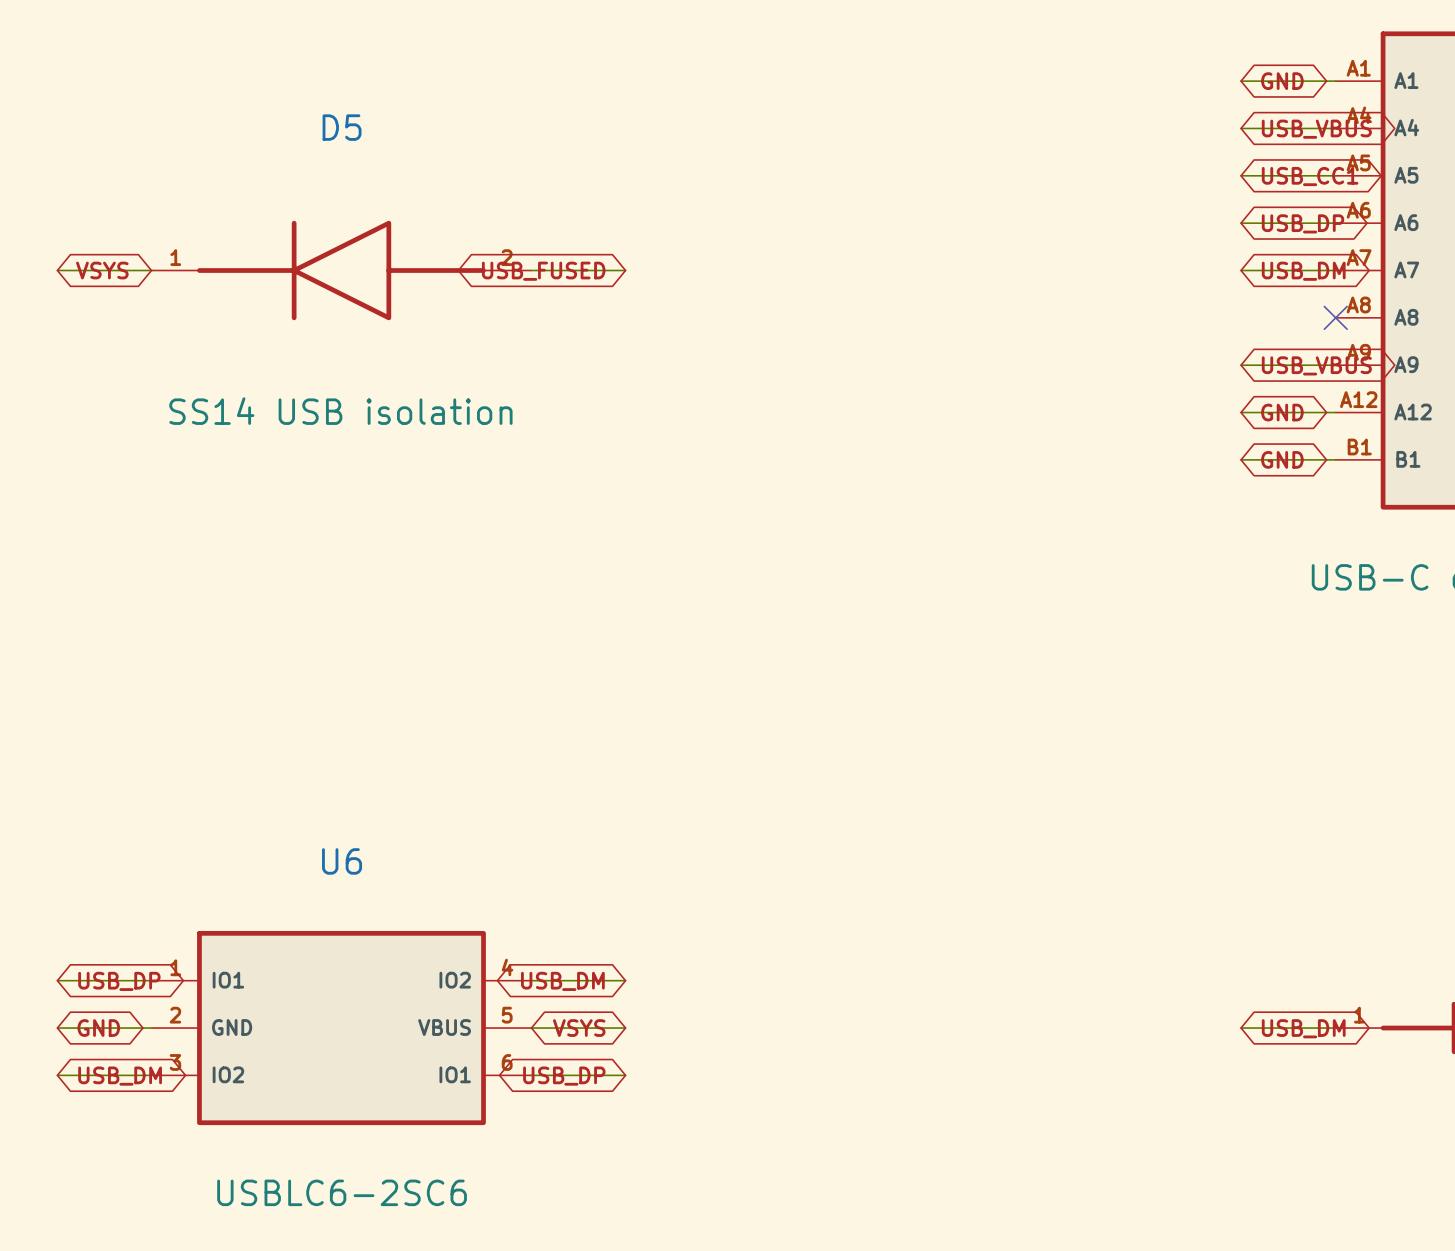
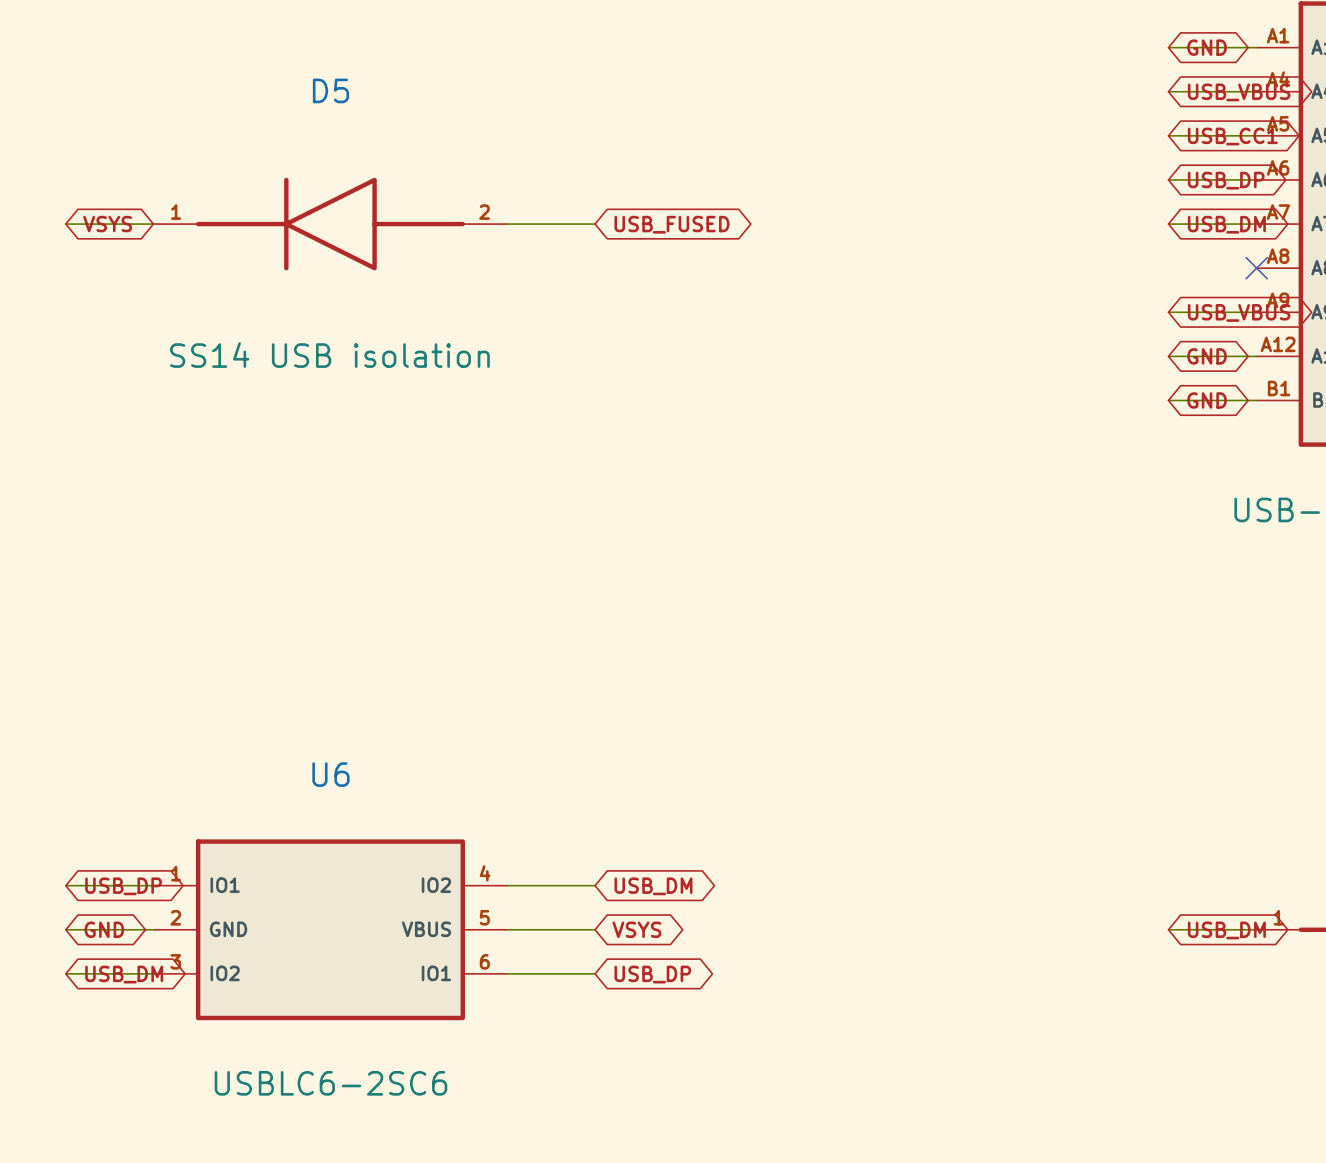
global label rotation: 0° (543, 271) -> 180° (672, 224)
global label rotation: 0° (562, 981) -> 180° (653, 886)
global label rotation: 0° (579, 1028) -> 180° (636, 929)
global label rotation: 0° (564, 1076) -> 180° (652, 974)
global label position: USB_DP (564, 1076) -> USB_DP (652, 974)

